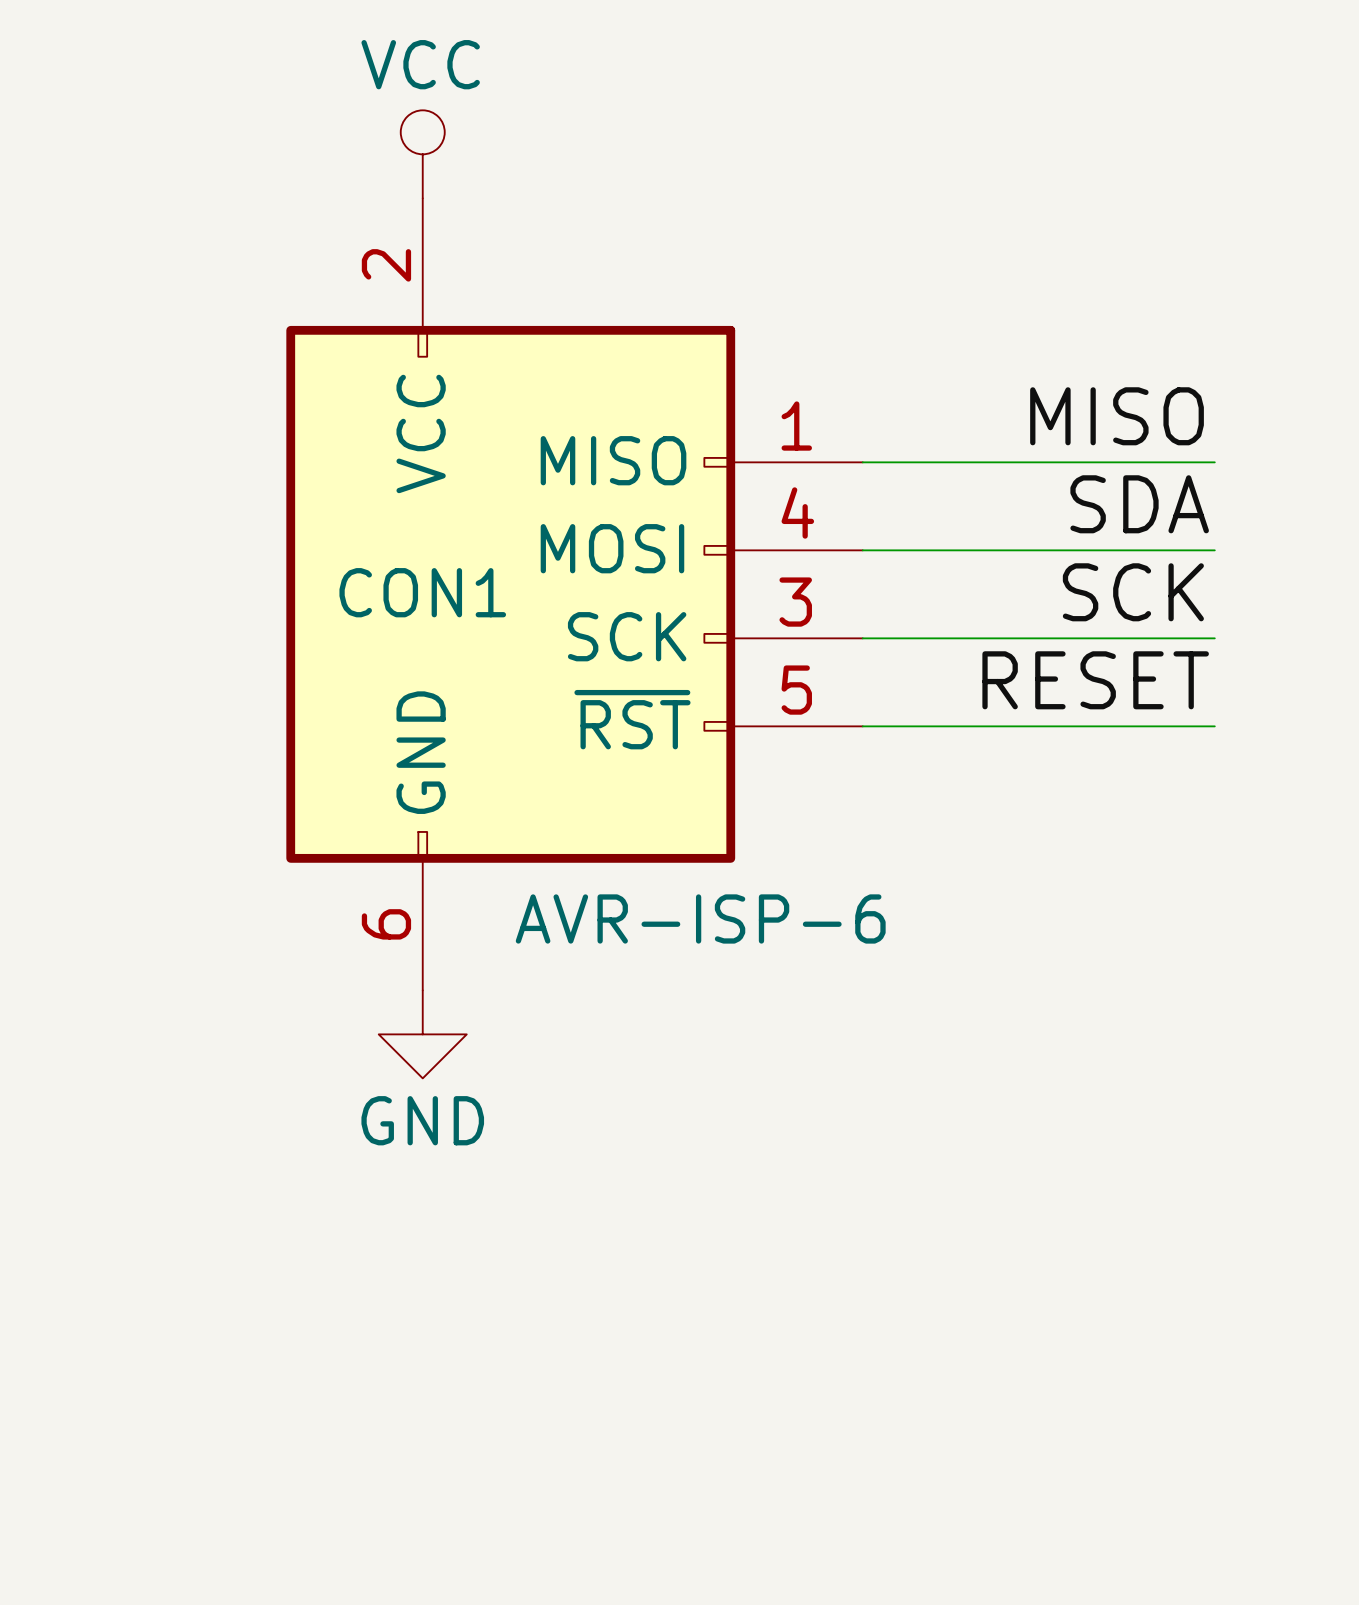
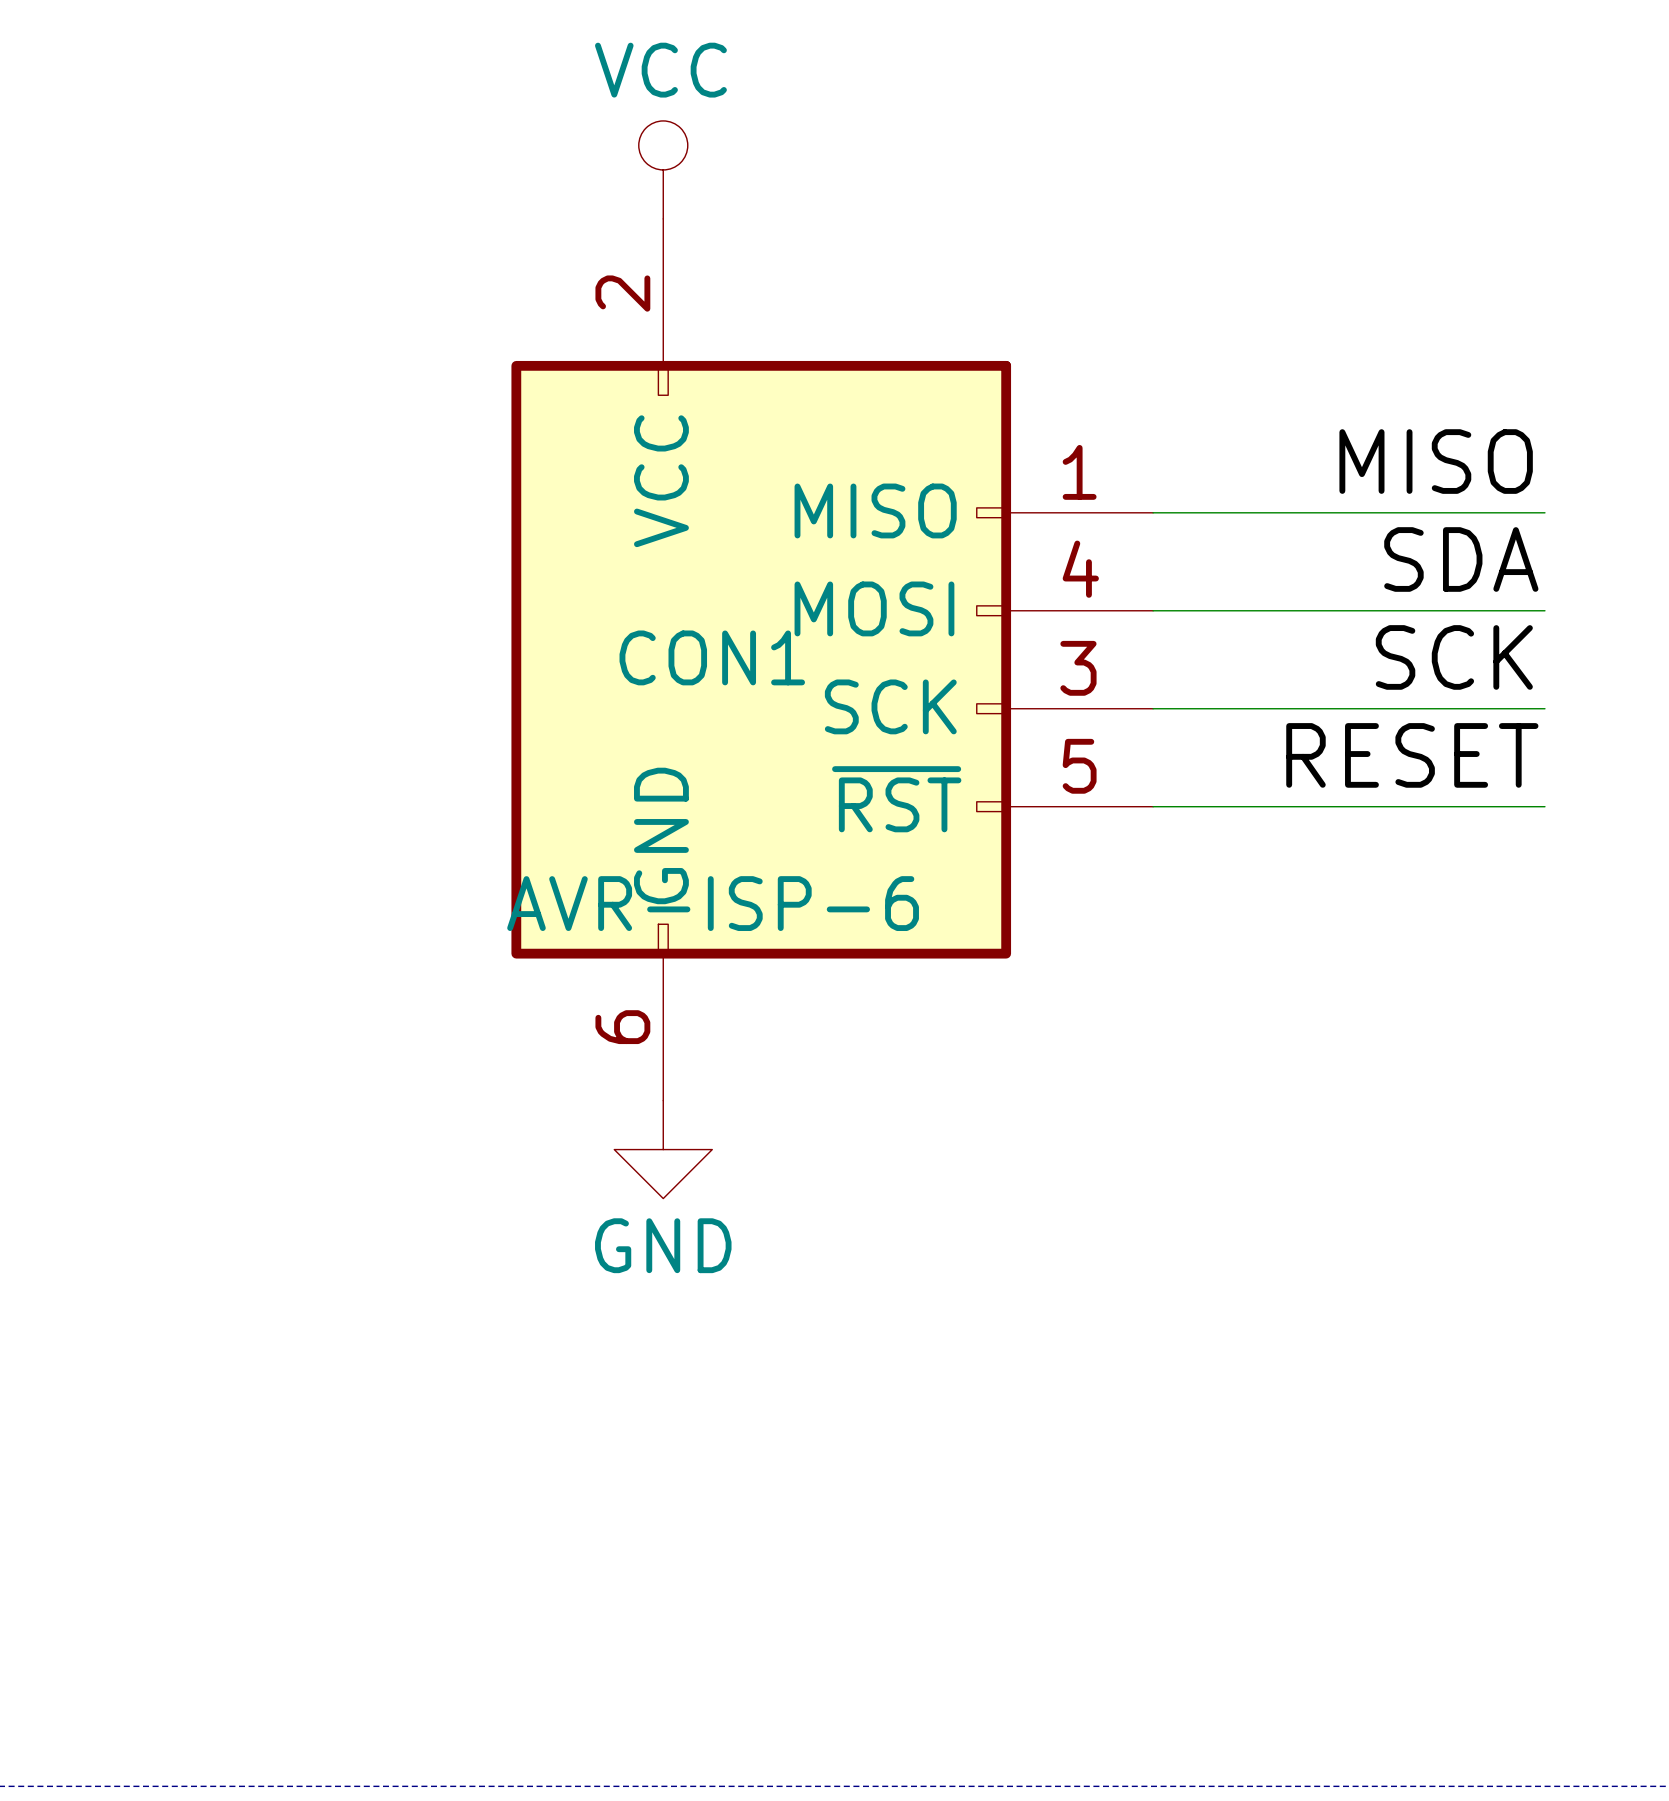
CON1 name position: CON1 (422, 592) -> CON1 (712, 657)
CON1 value position: AVR-ISP-6 (700, 918) -> AVR-ISP-6 (713, 903)

